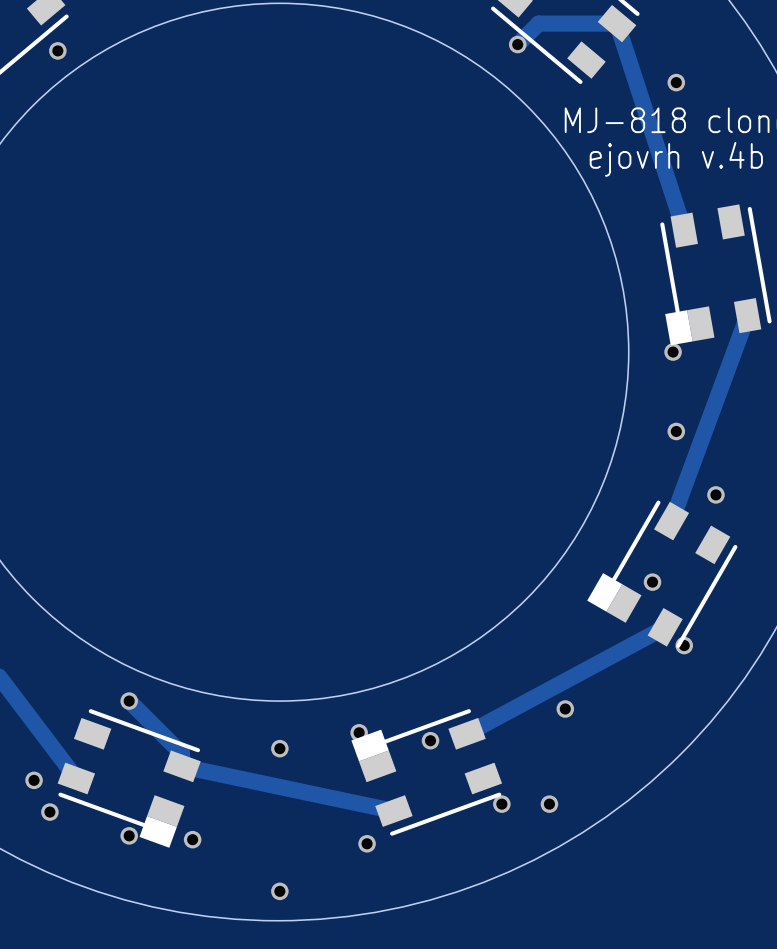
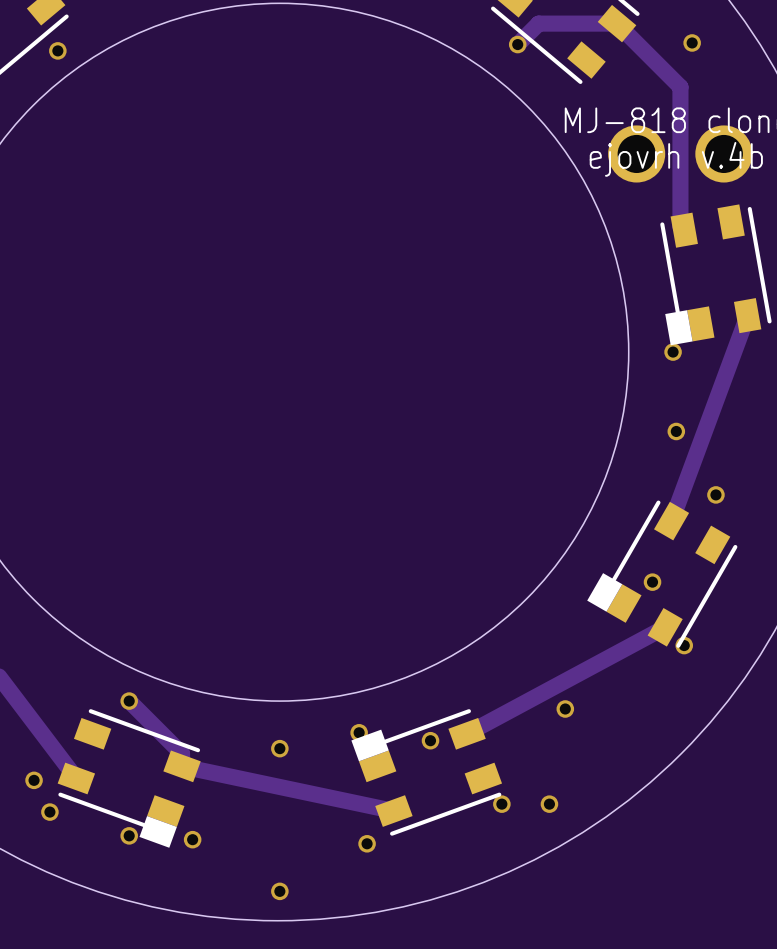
track: (617, 23) (684, 230) -> (617, 23) (680, 87) (680, 226) (684, 230)
via position: (676, 82) -> (692, 42)
part: none -> (636, 153)
part: none -> (723, 153)

